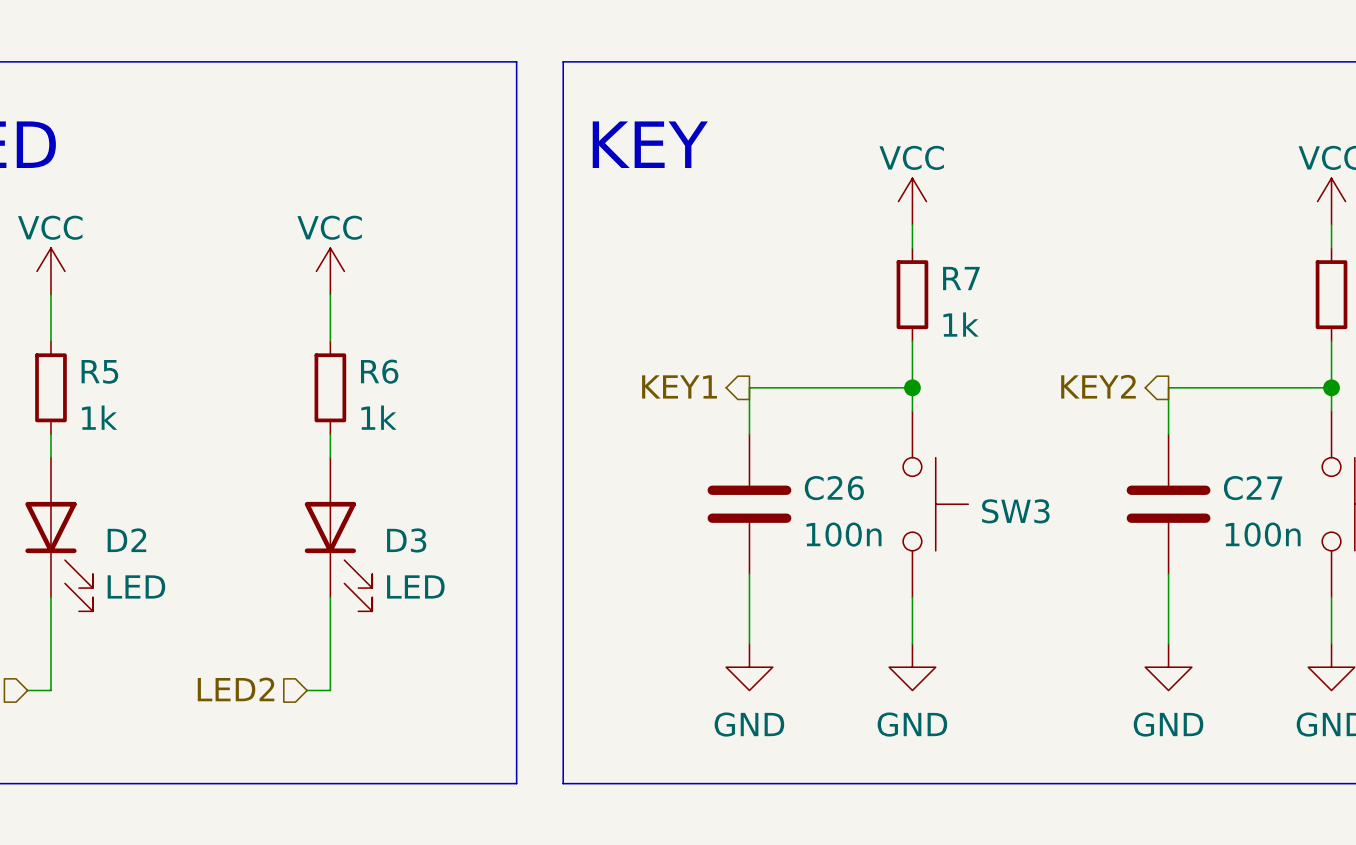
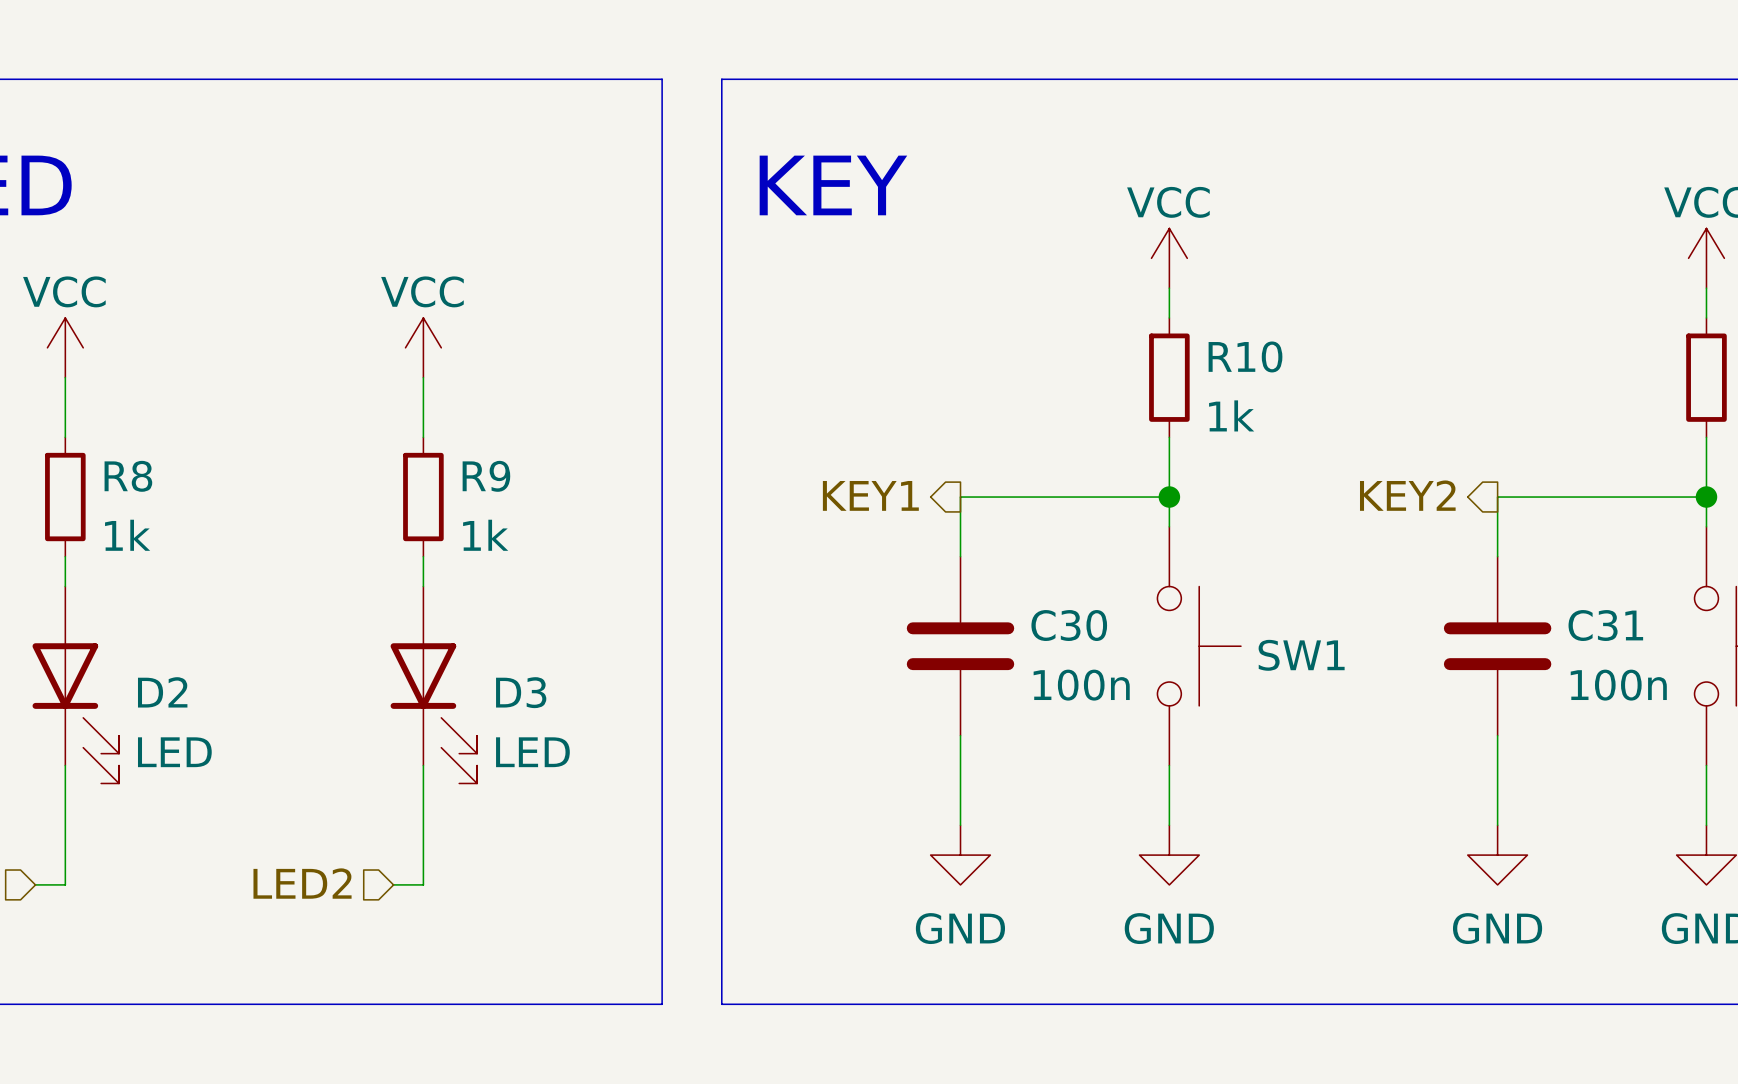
R7 name: R7 (961, 278) -> R10 (1245, 356)
R5 name: R5 (99, 371) -> R8 (128, 476)
R6 name: R6 (379, 371) -> R9 (486, 476)
C26 name: C26 (834, 488) -> C30 (1069, 625)
C27 name: C27 (1253, 488) -> C31 (1605, 625)
SW3 name: SW3 (1015, 511) -> SW1 (1301, 655)

